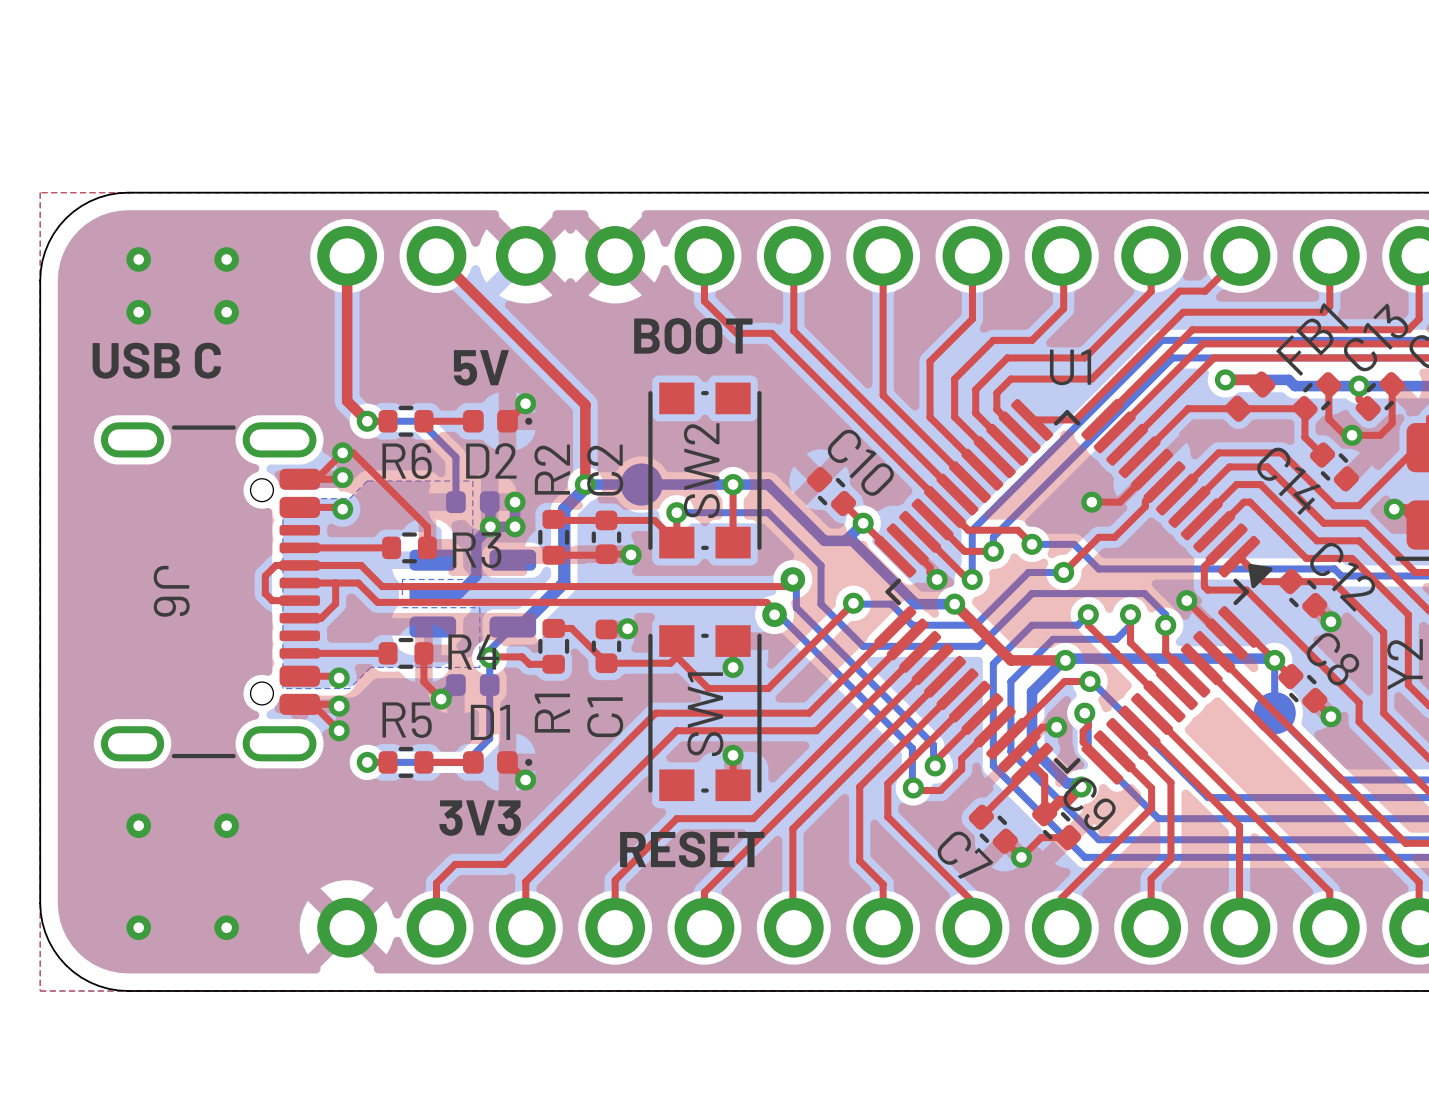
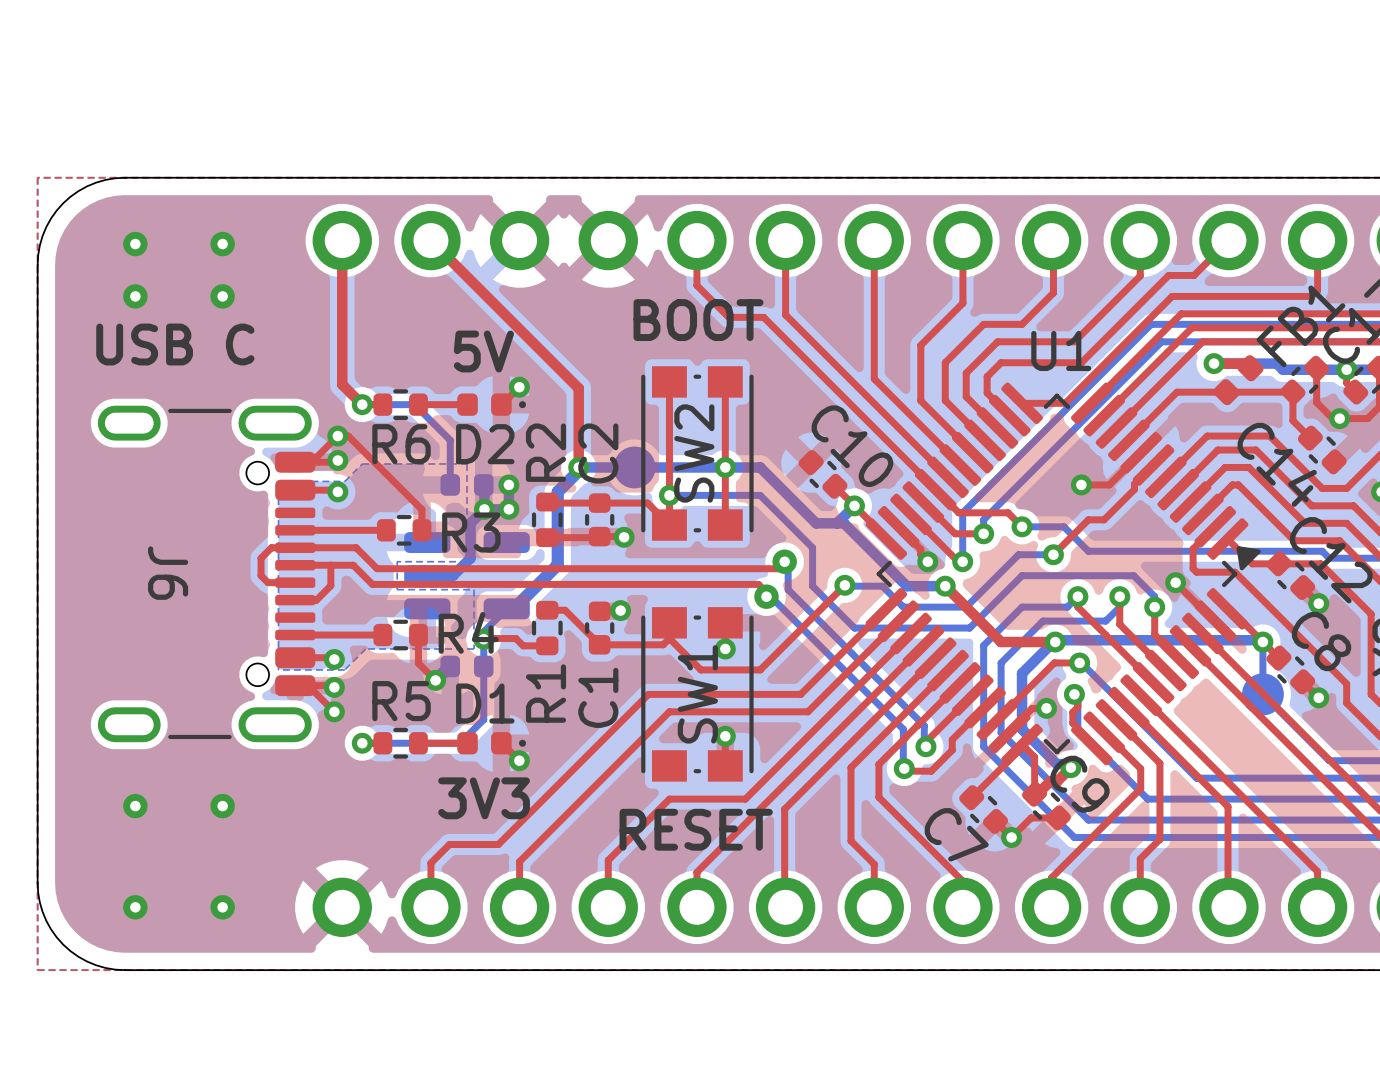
top track: none -> (669, 381) (669, 495)
top track: none -> (725, 381) (725, 467)

